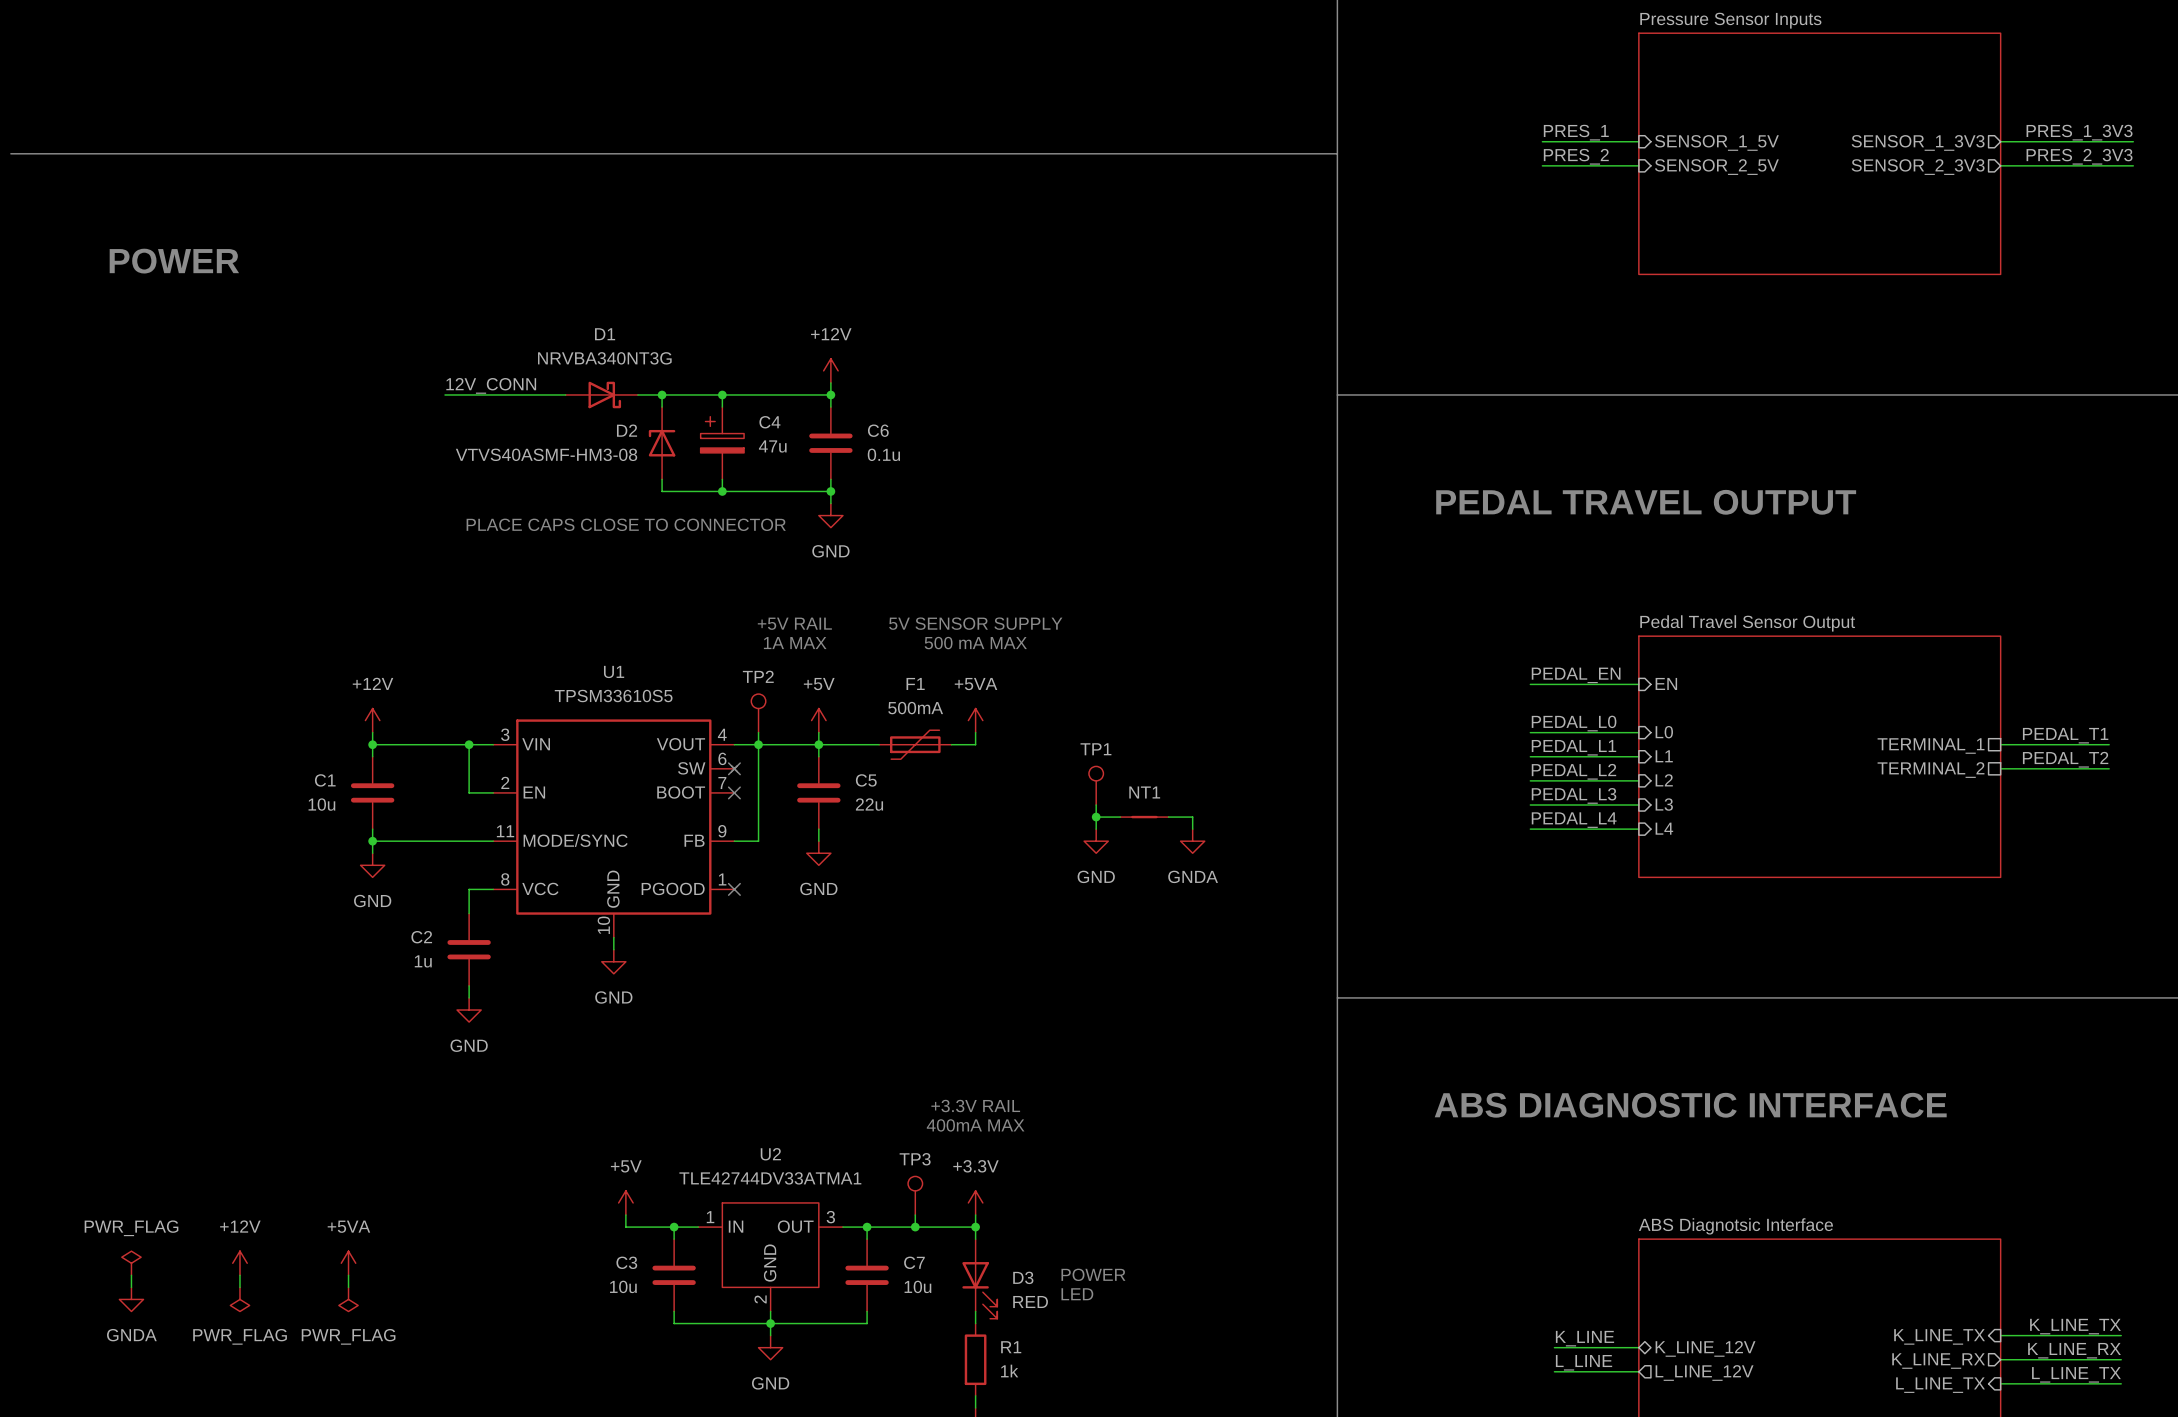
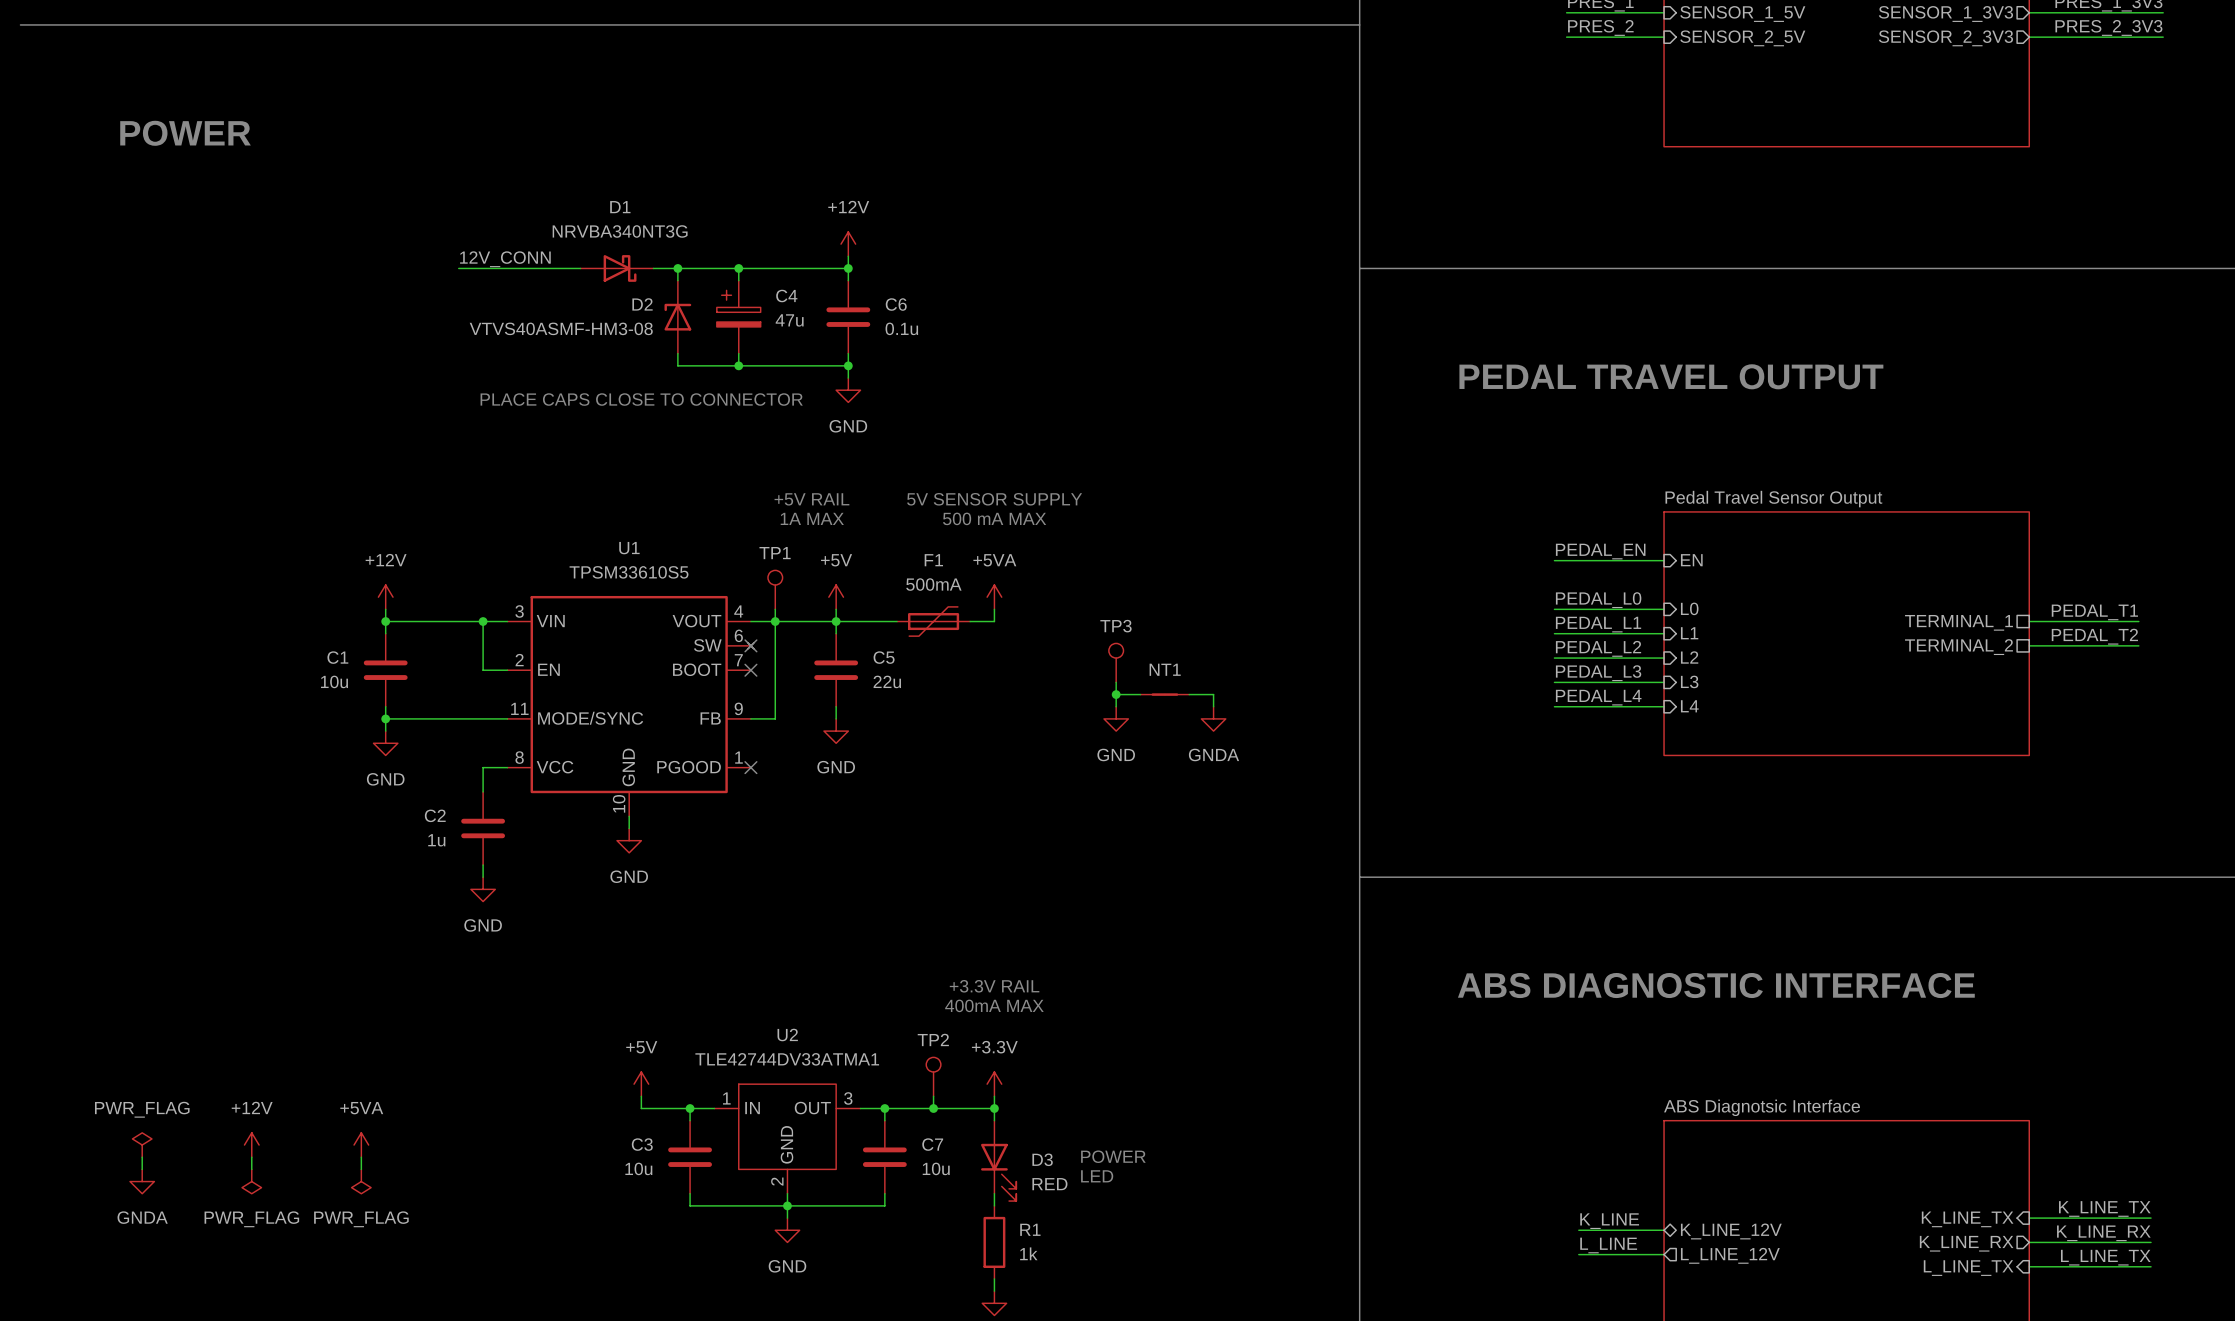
TP2 name: TP2 (758, 676) -> TP1 (775, 553)
TP1 name: TP1 (1095, 749) -> TP3 (1115, 626)
TP3 name: TP3 (915, 1159) -> TP2 (933, 1039)

